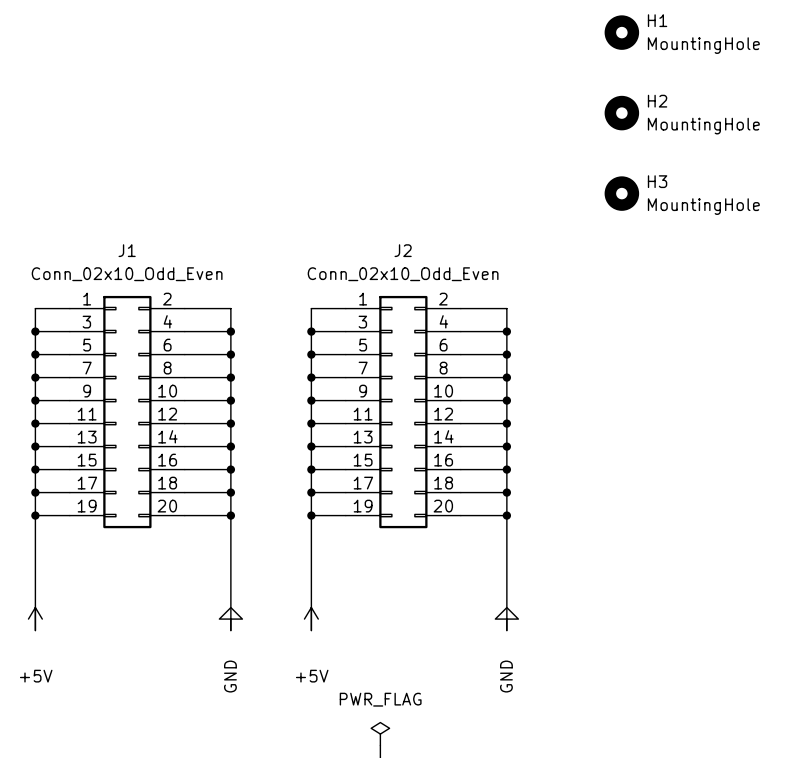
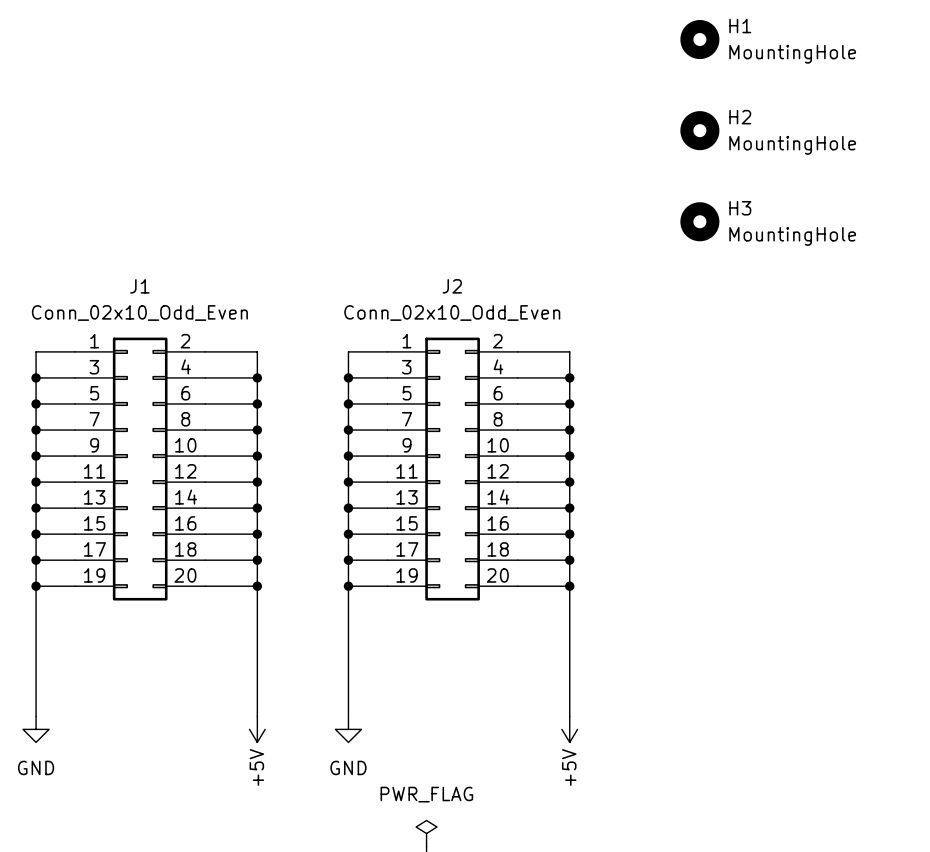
power symbol: +5V (35, 619) -> none
power symbol rotation: 0° (230, 619) -> 180° (348, 729)
power symbol position: GND (230, 619) -> GND (348, 729)
power symbol rotation: 0° (311, 619) -> 180° (257, 729)
power symbol position: +5V (311, 619) -> +5V (257, 729)
power symbol: GND (506, 619) -> none
power symbol: none -> GND (36, 729)
power symbol: none -> +5V (569, 729)
power symbol text position: GND (230, 676) -> GND (348, 767)
power symbol text position: +5V (312, 676) -> +5V (256, 767)

